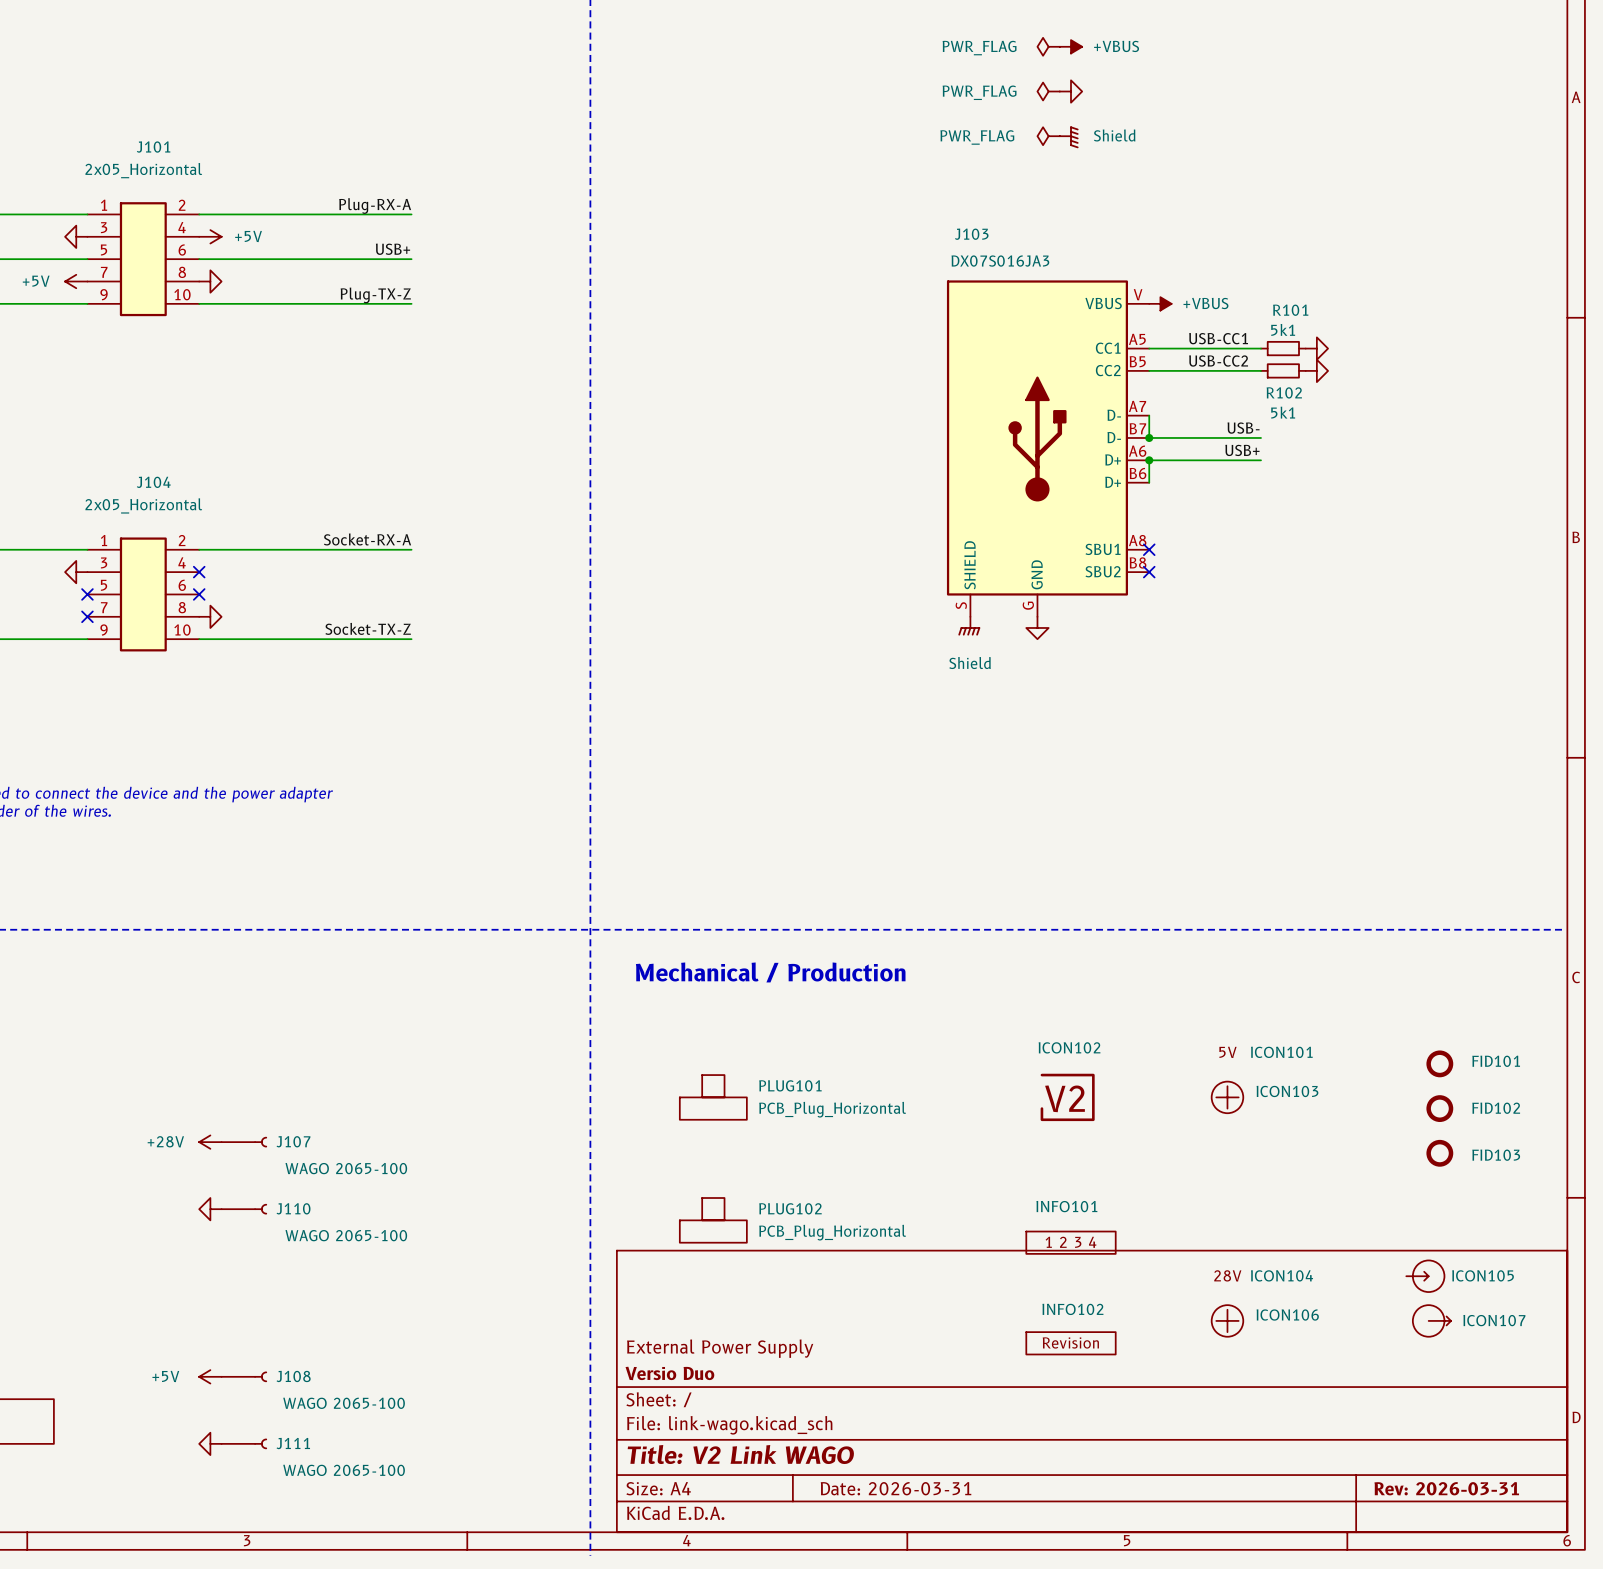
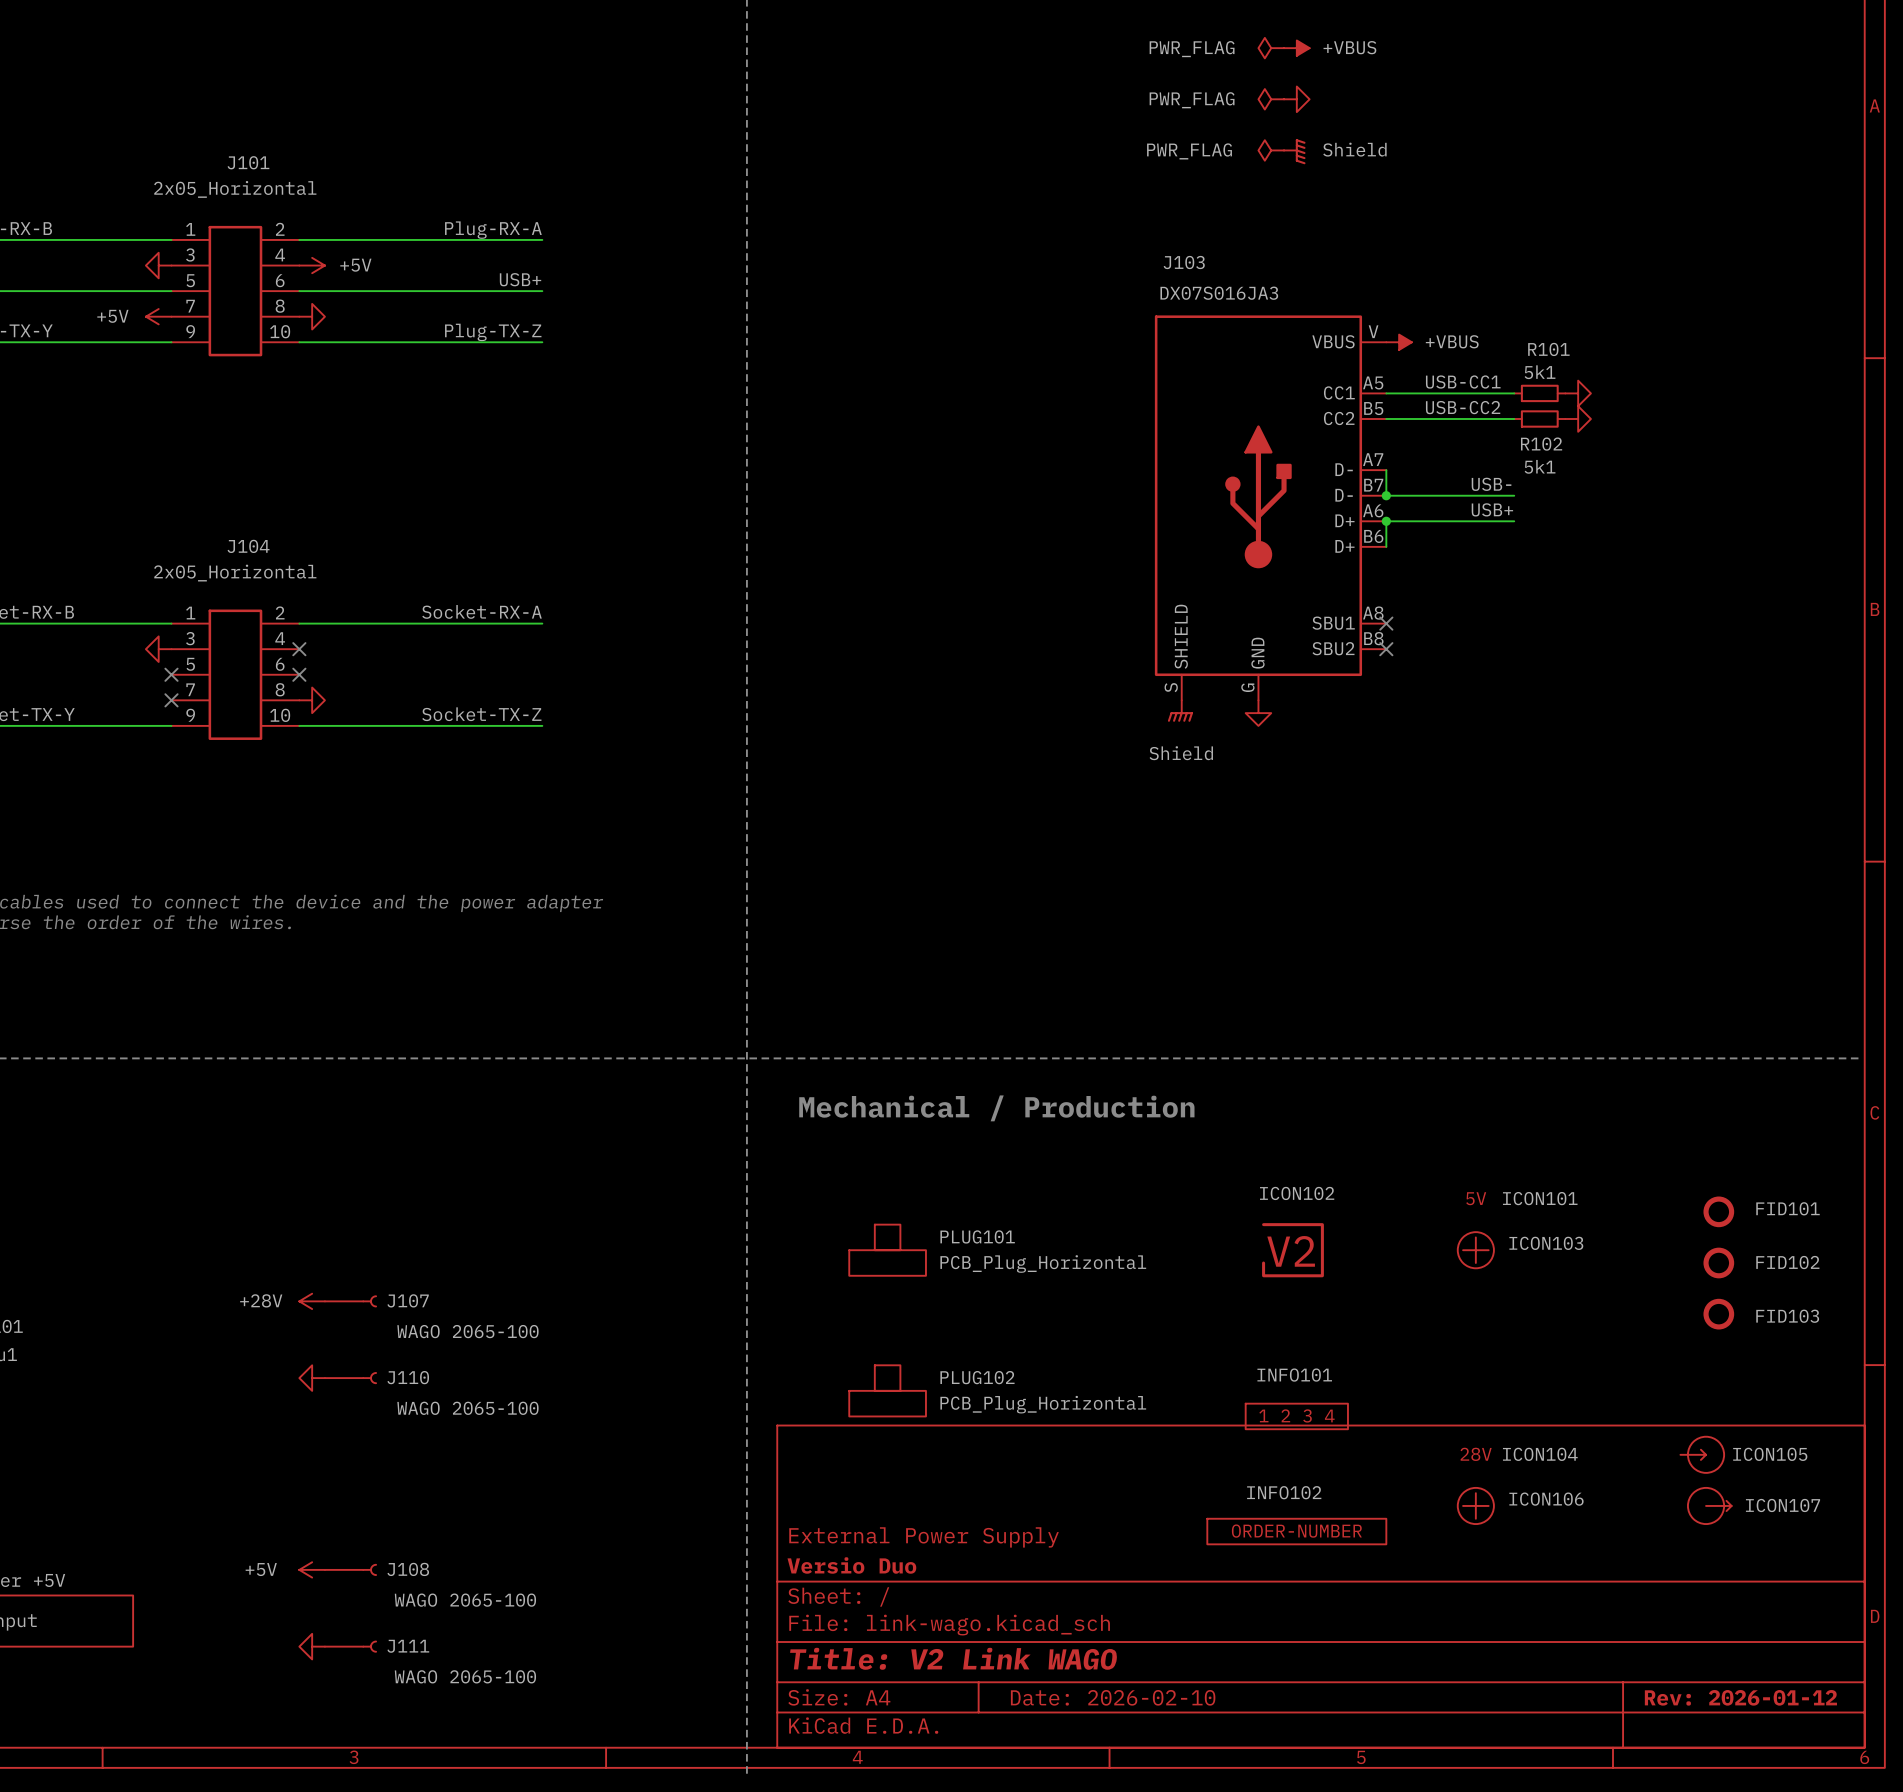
INFO102 symbol: [1026, 1332, 1116, 1355] -> [1207, 1518, 1387, 1545]
title block: Date: 2026-03-31 (896, 1488) -> Date: 2026-02-10 (1113, 1697)
title block: Rev: 2026-03-31 (1446, 1488) -> Rev: 2026-01-12 (1740, 1697)

